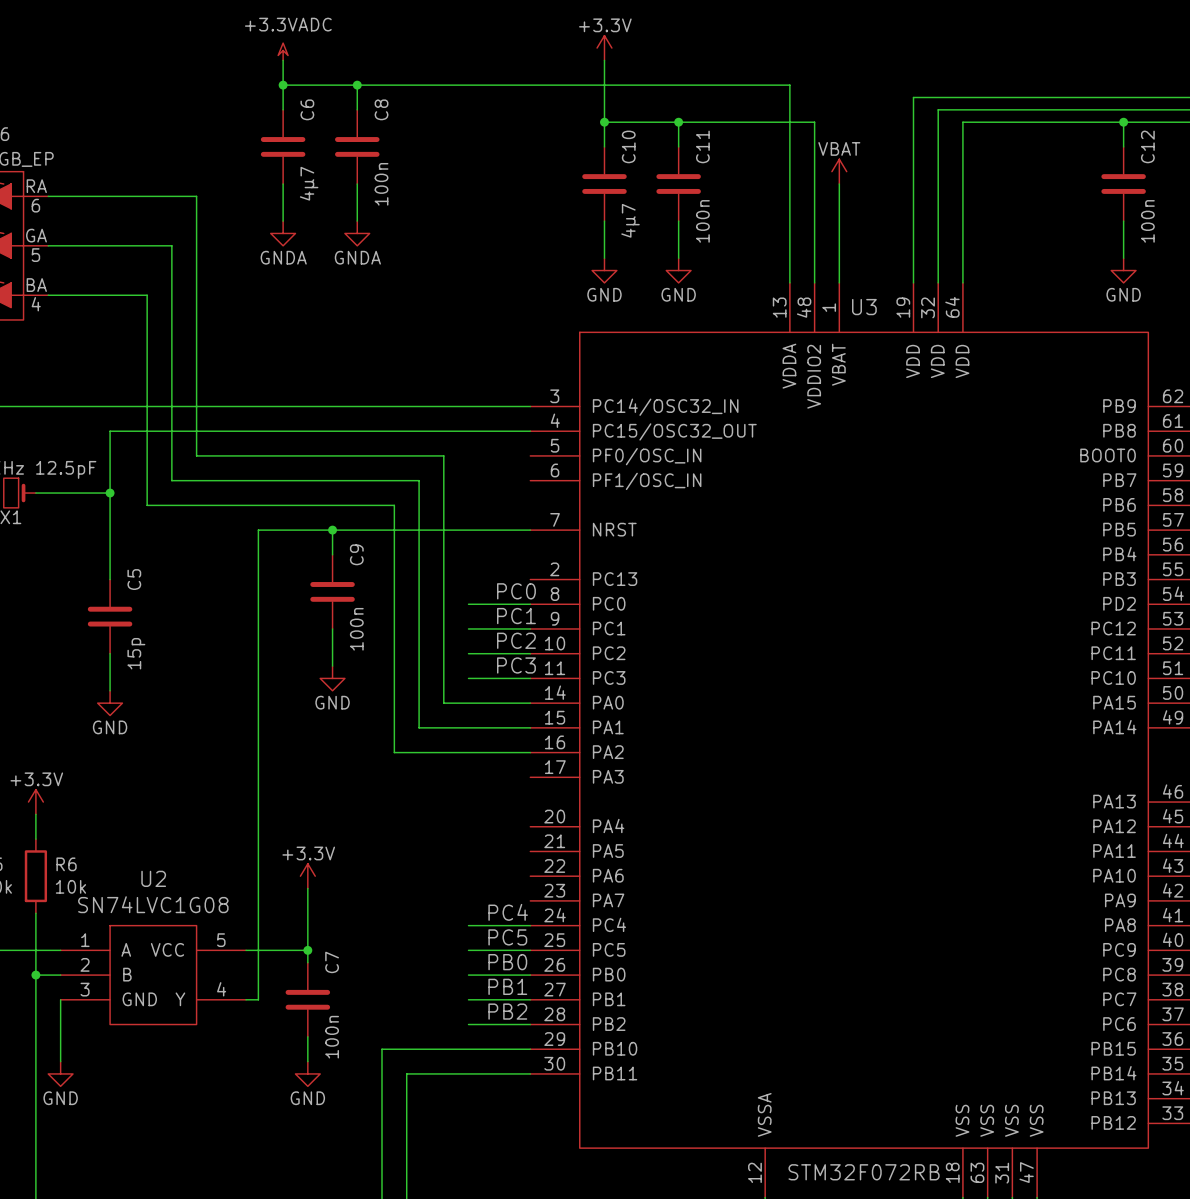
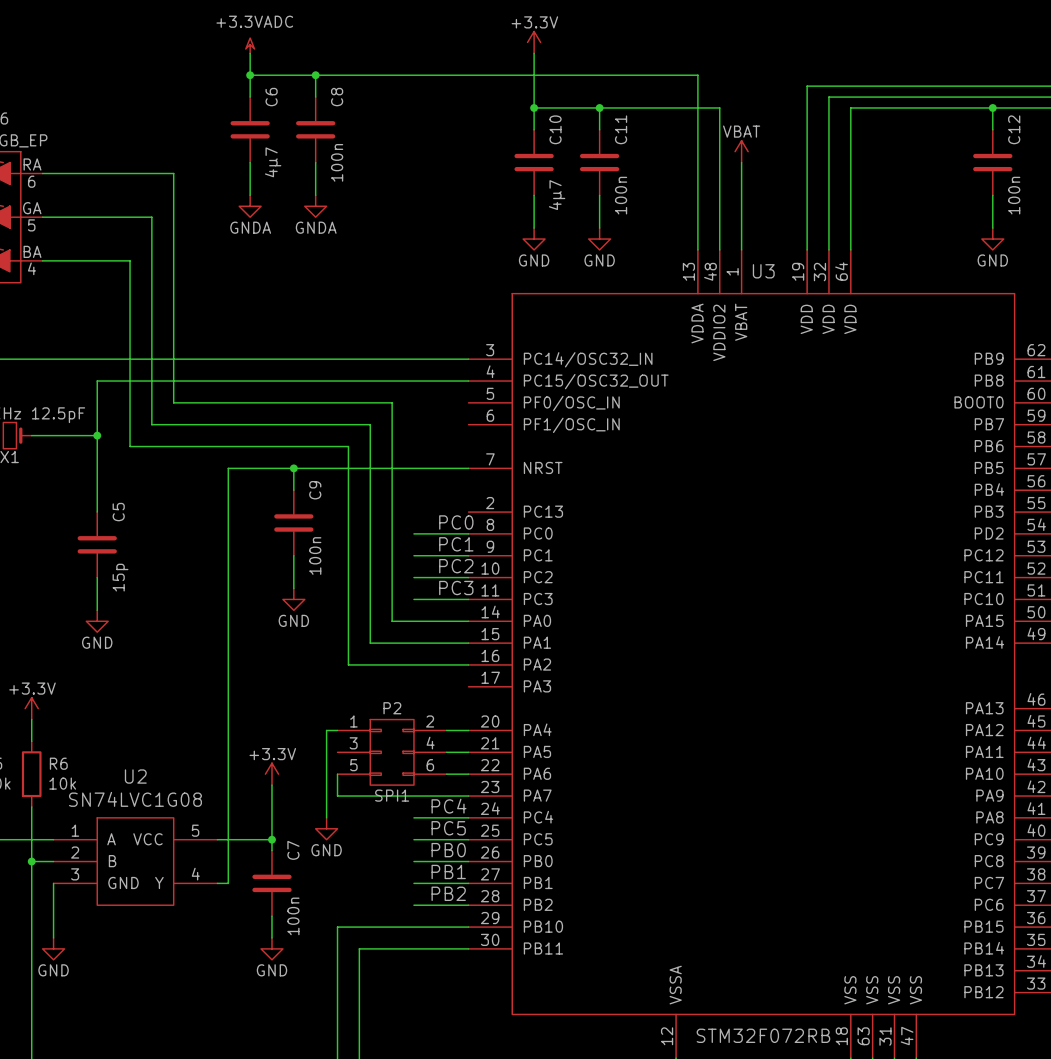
wire: none -> (337, 730) (326, 730) (326, 817)
wire: none -> (446, 730) (468, 730)
P2: none -> SPI1 (392, 752)
wire: none -> (446, 752) (468, 752)
wire: none -> (337, 774) (337, 796) (468, 796)
wire: none -> (446, 774) (468, 774)
power symbol: none -> GND (326, 828)

